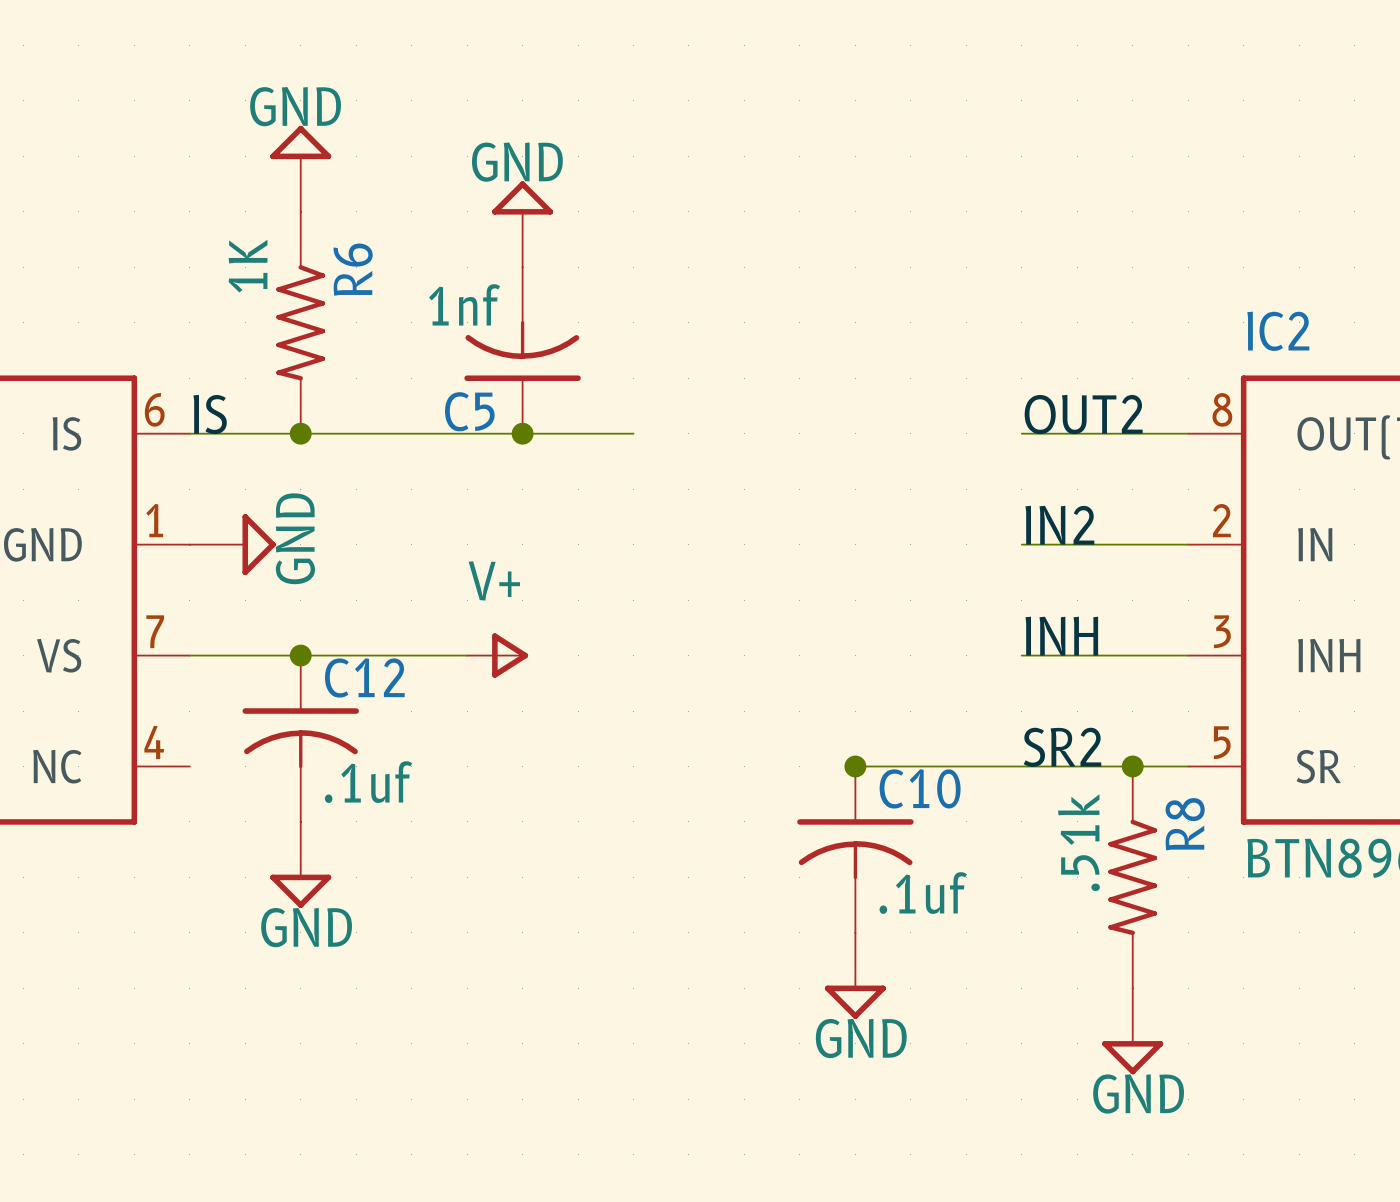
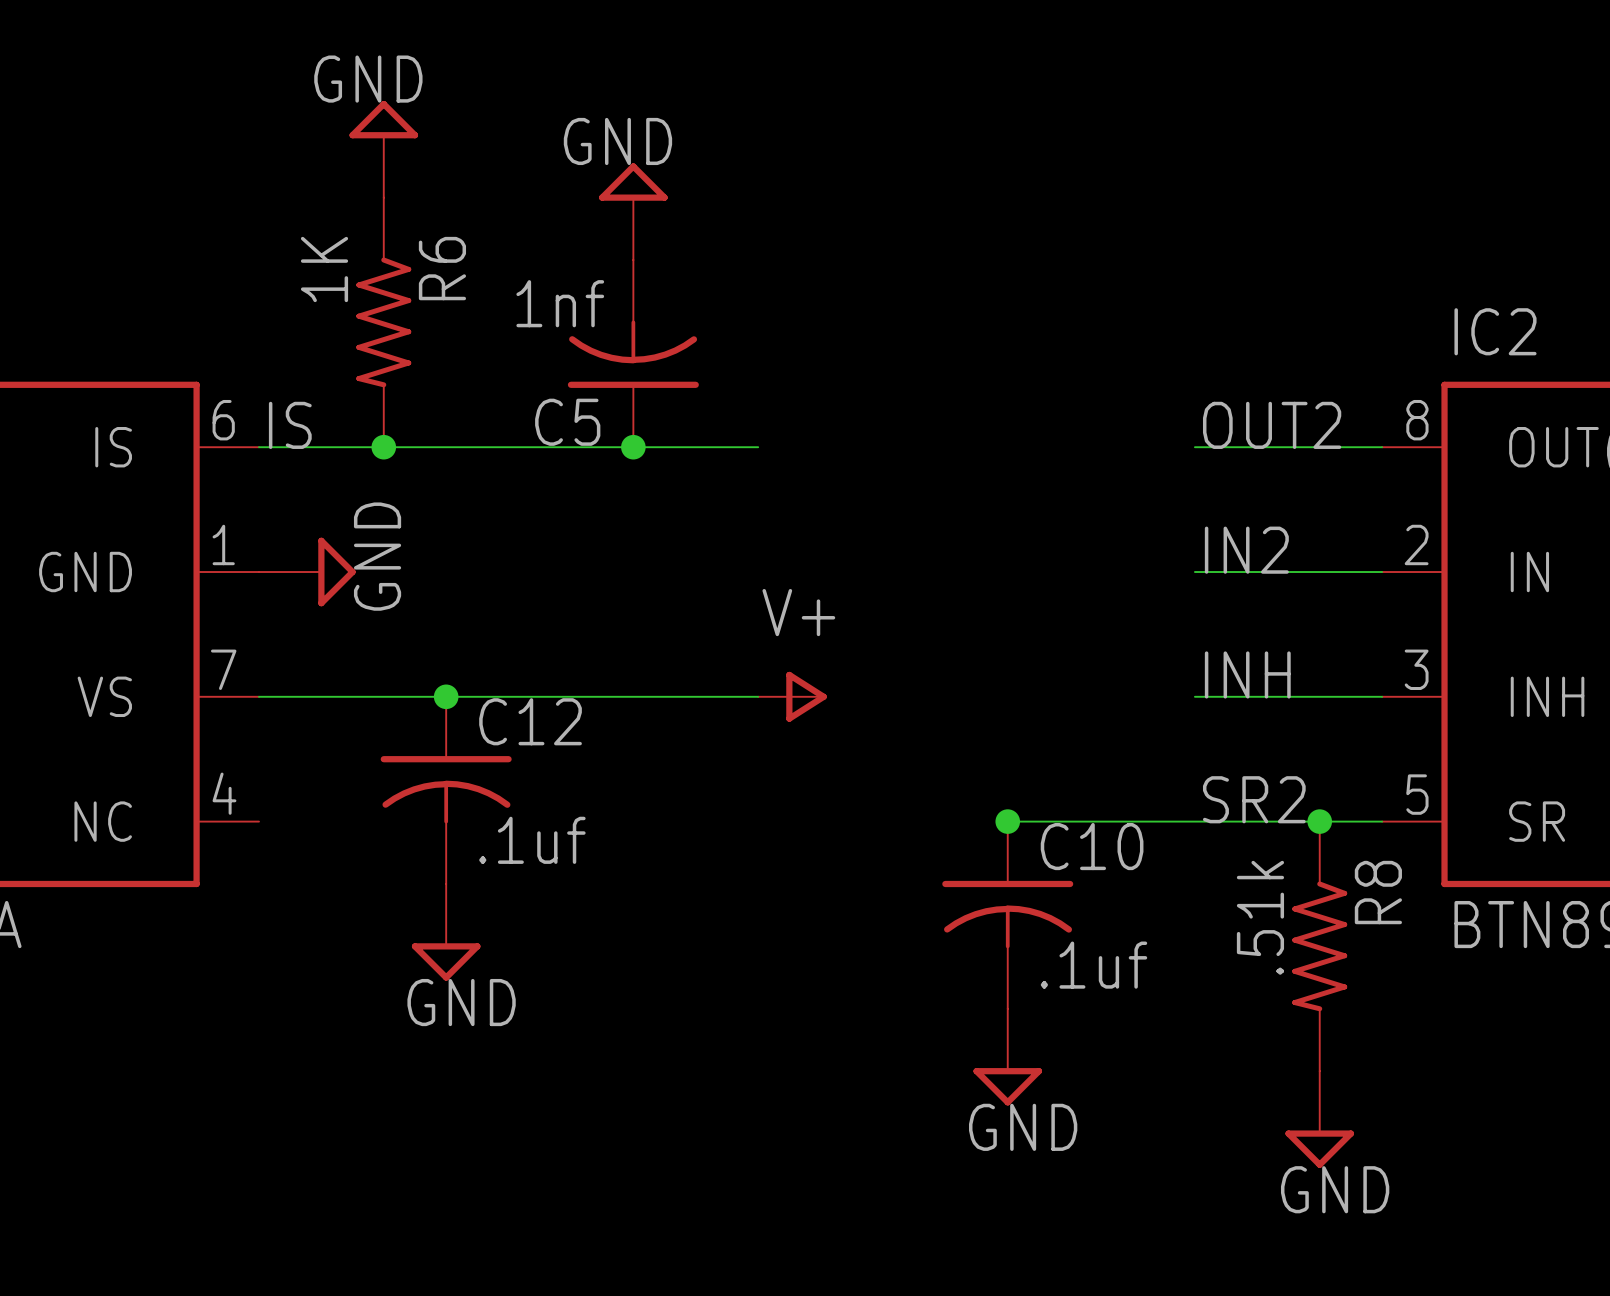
junction position: (300, 655) -> (446, 696)
wire: none -> (570, 696) (758, 696)
power symbol position: V+ (497, 655) -> V+ (792, 696)
C12 position: (300, 738) -> (446, 790)
power symbol position: GND (300, 864) -> GND (446, 932)

